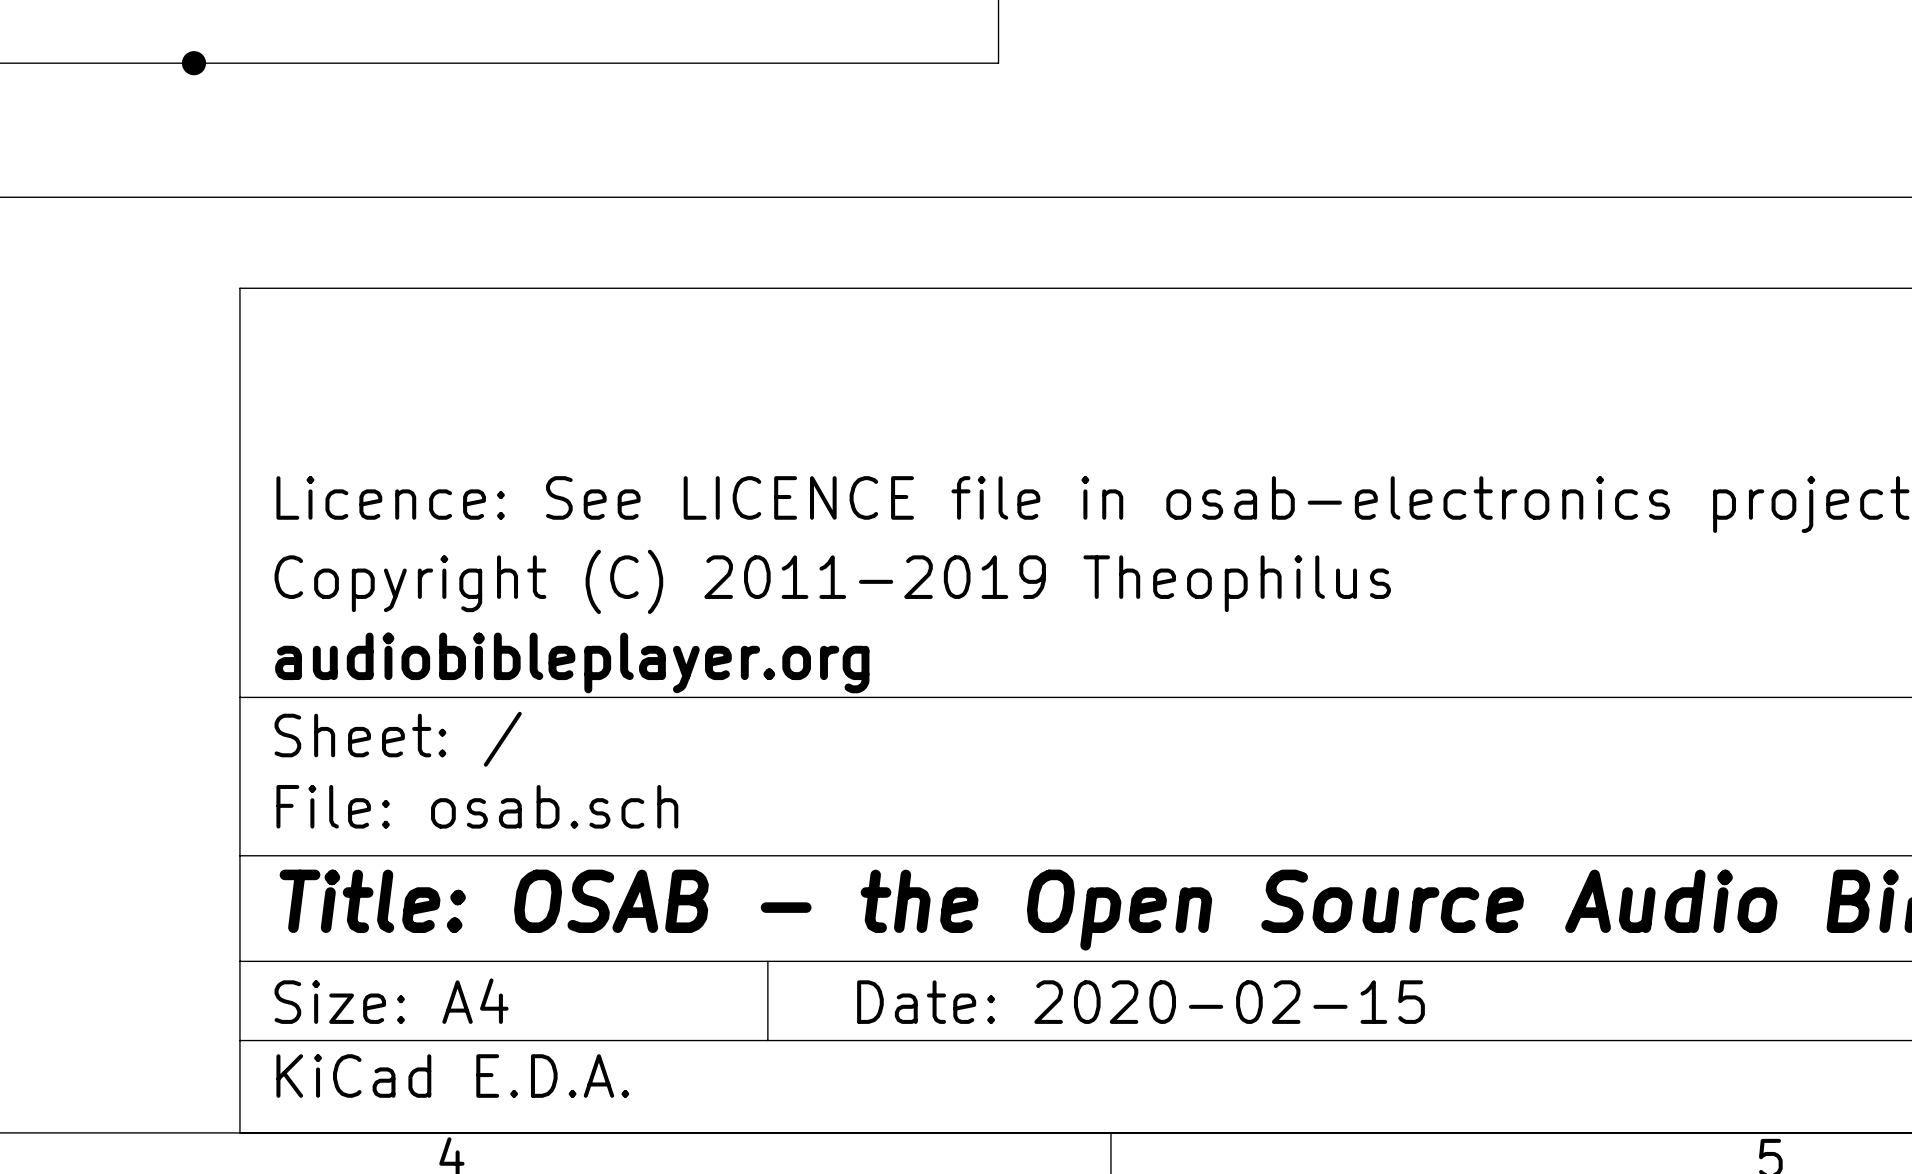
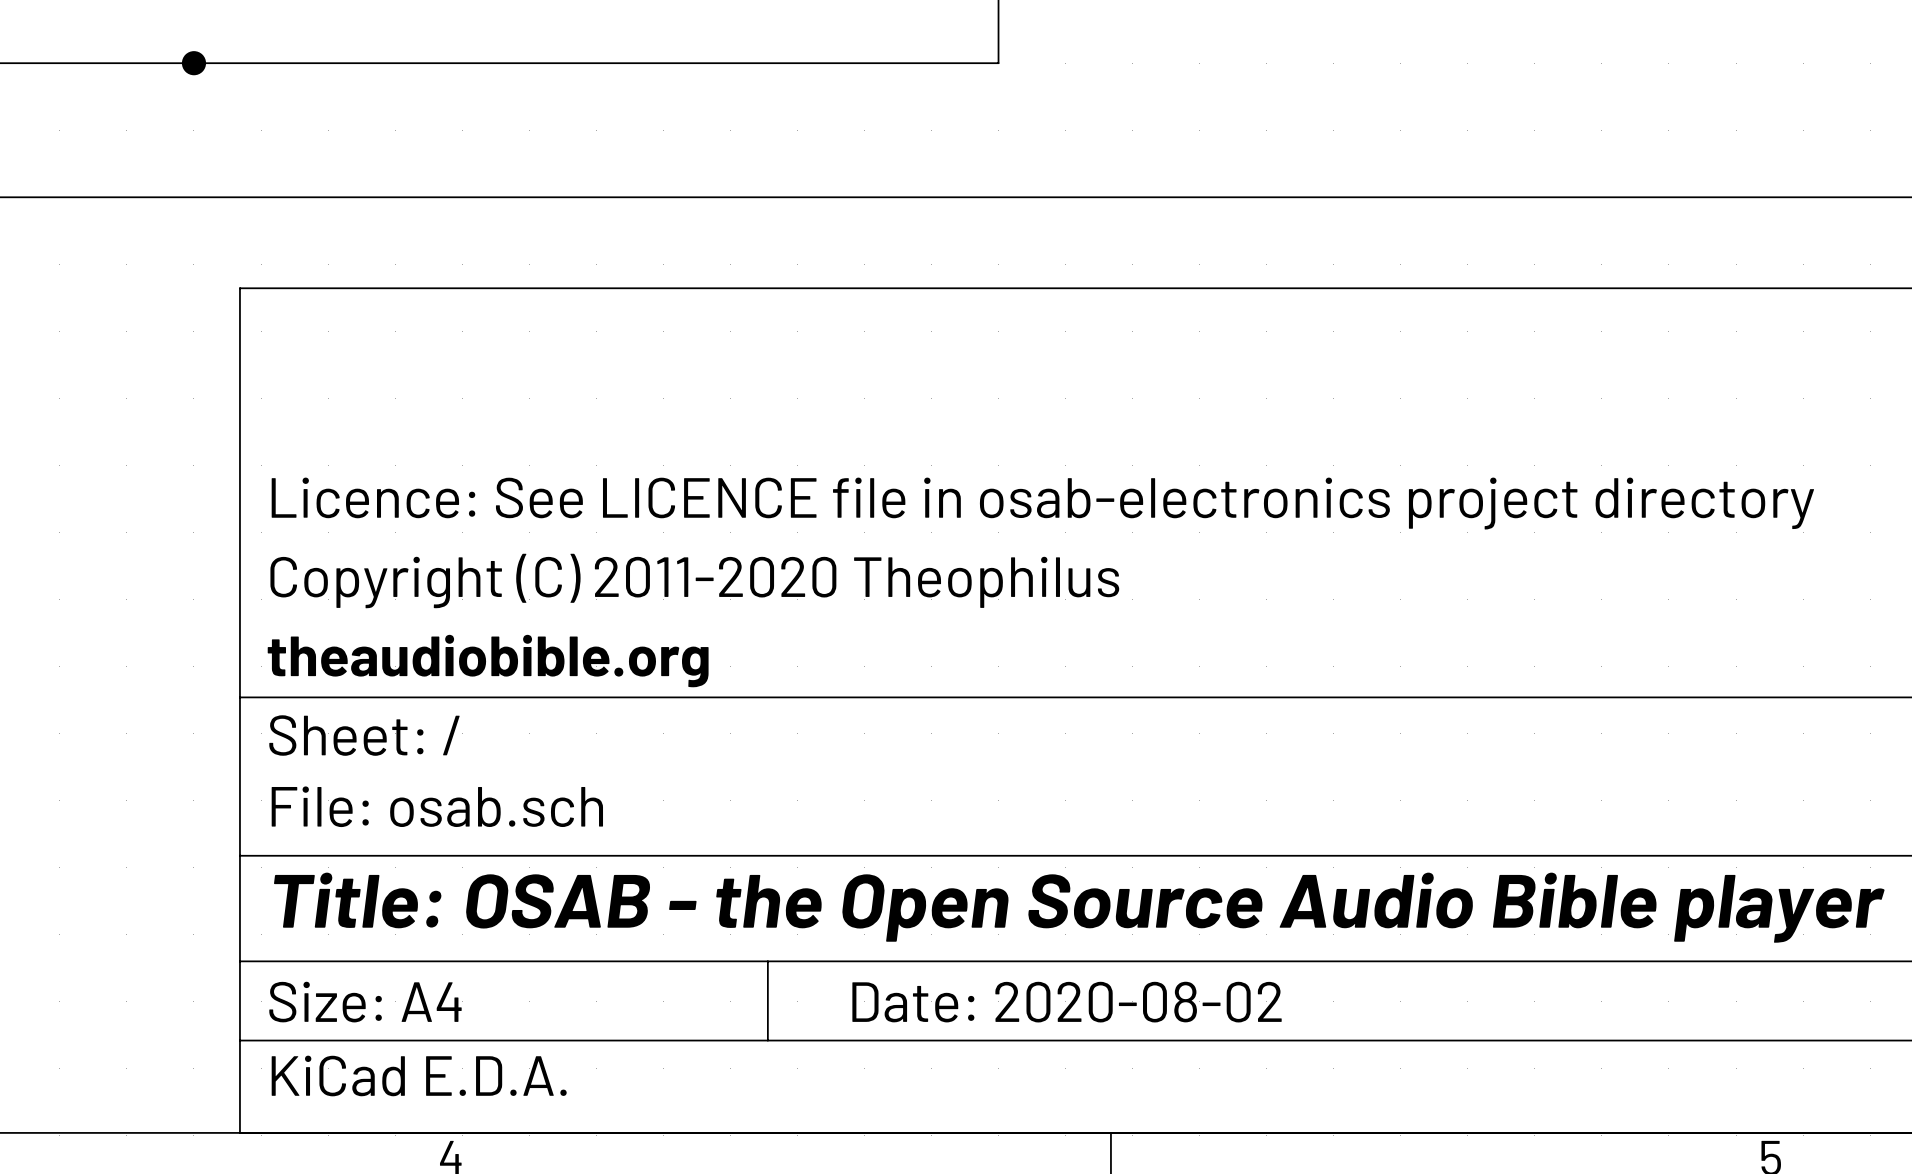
title block: Copyright (C) 2011-2019 Theophilus (832, 581) -> Copyright (C) 2011-2020 Theophilus (694, 581)
title block: audiobibleplayer.org (572, 662) -> theaudiobible.org (488, 661)
title block: Date: 2020-02-15 (1141, 1002) -> Date: 2020-08-02 (1067, 1002)

